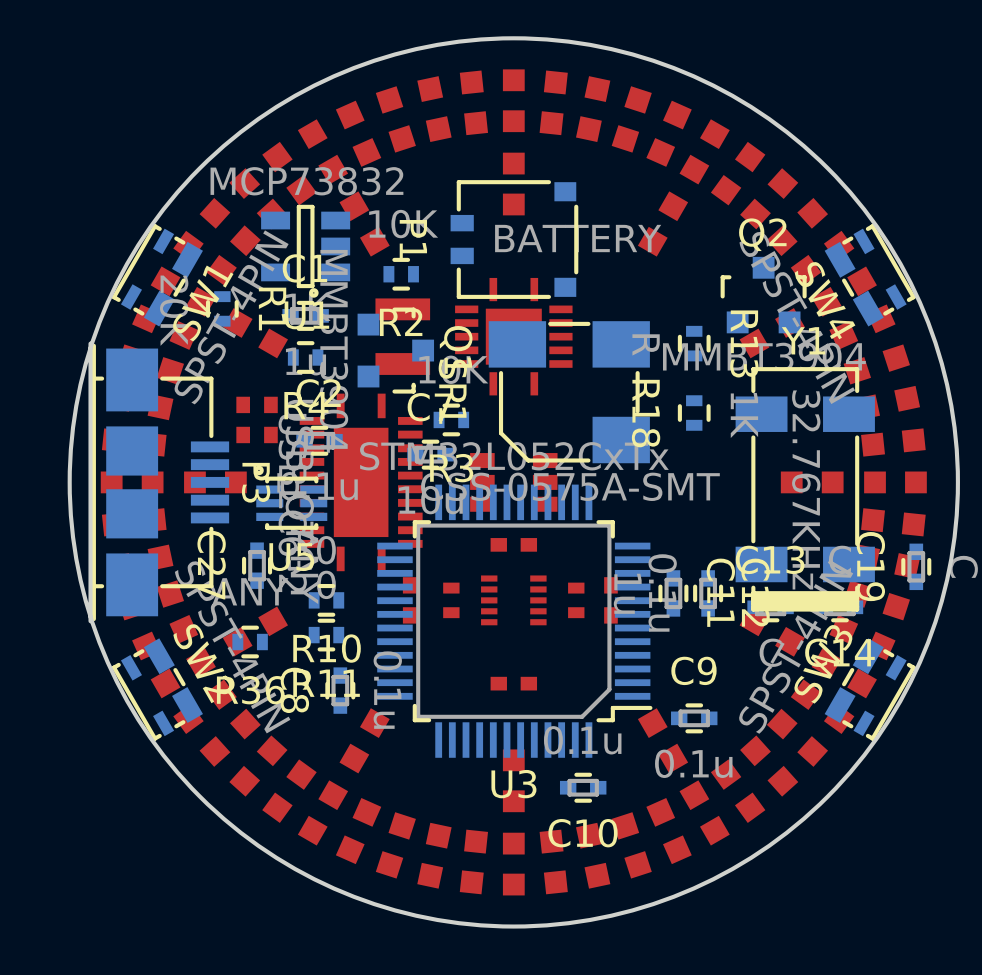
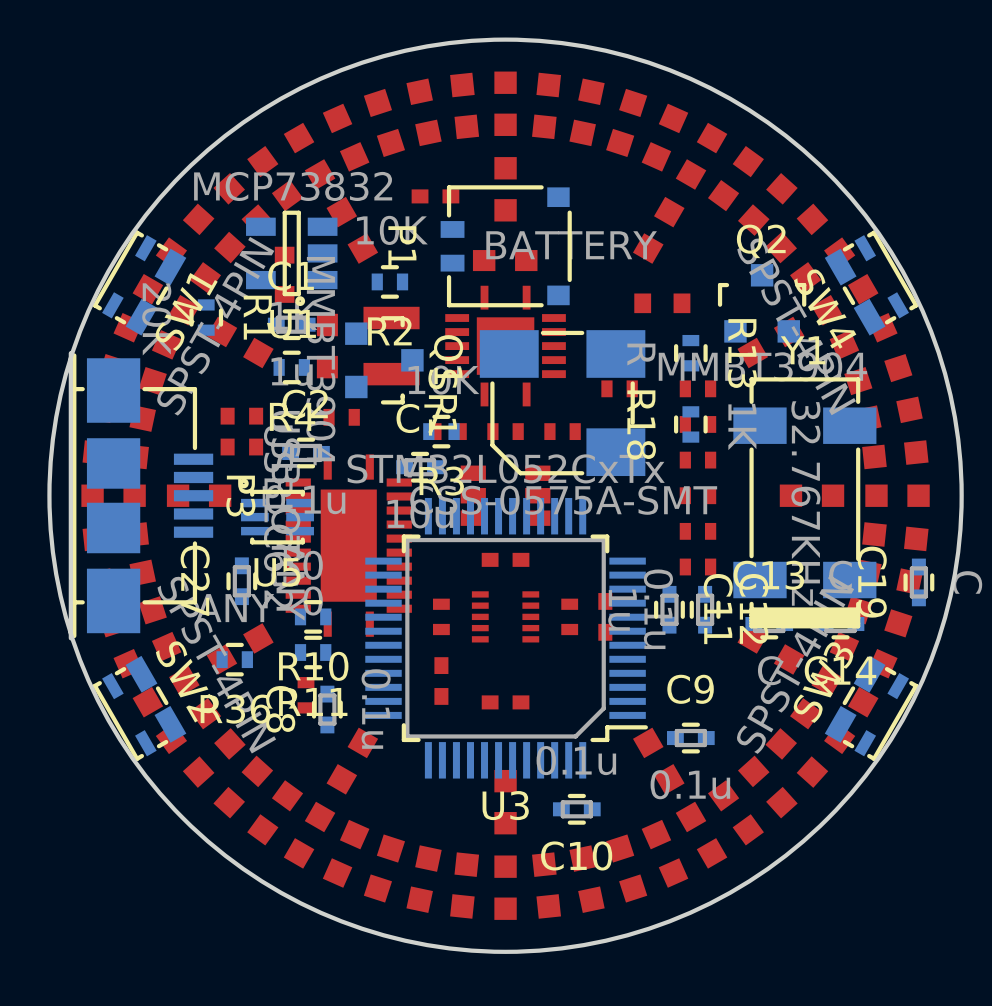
part: none -> (435, 196)
part: none -> (505, 260)
part: none -> (284, 274)
part: none -> (662, 303)
part: none -> (327, 346)
part: none -> (619, 388)
part: none -> (697, 388)
part: none -> (341, 417)
part: none -> (697, 424)
part: none -> (448, 431)
part: none -> (505, 431)
part: none -> (562, 431)
part: none -> (697, 460)
part position: (361, 482) -> (348, 545)
part: none -> (697, 495)
part: none -> (697, 531)
part: none -> (697, 566)
part position: (409, 600) -> (441, 681)
part: none -> (306, 695)

